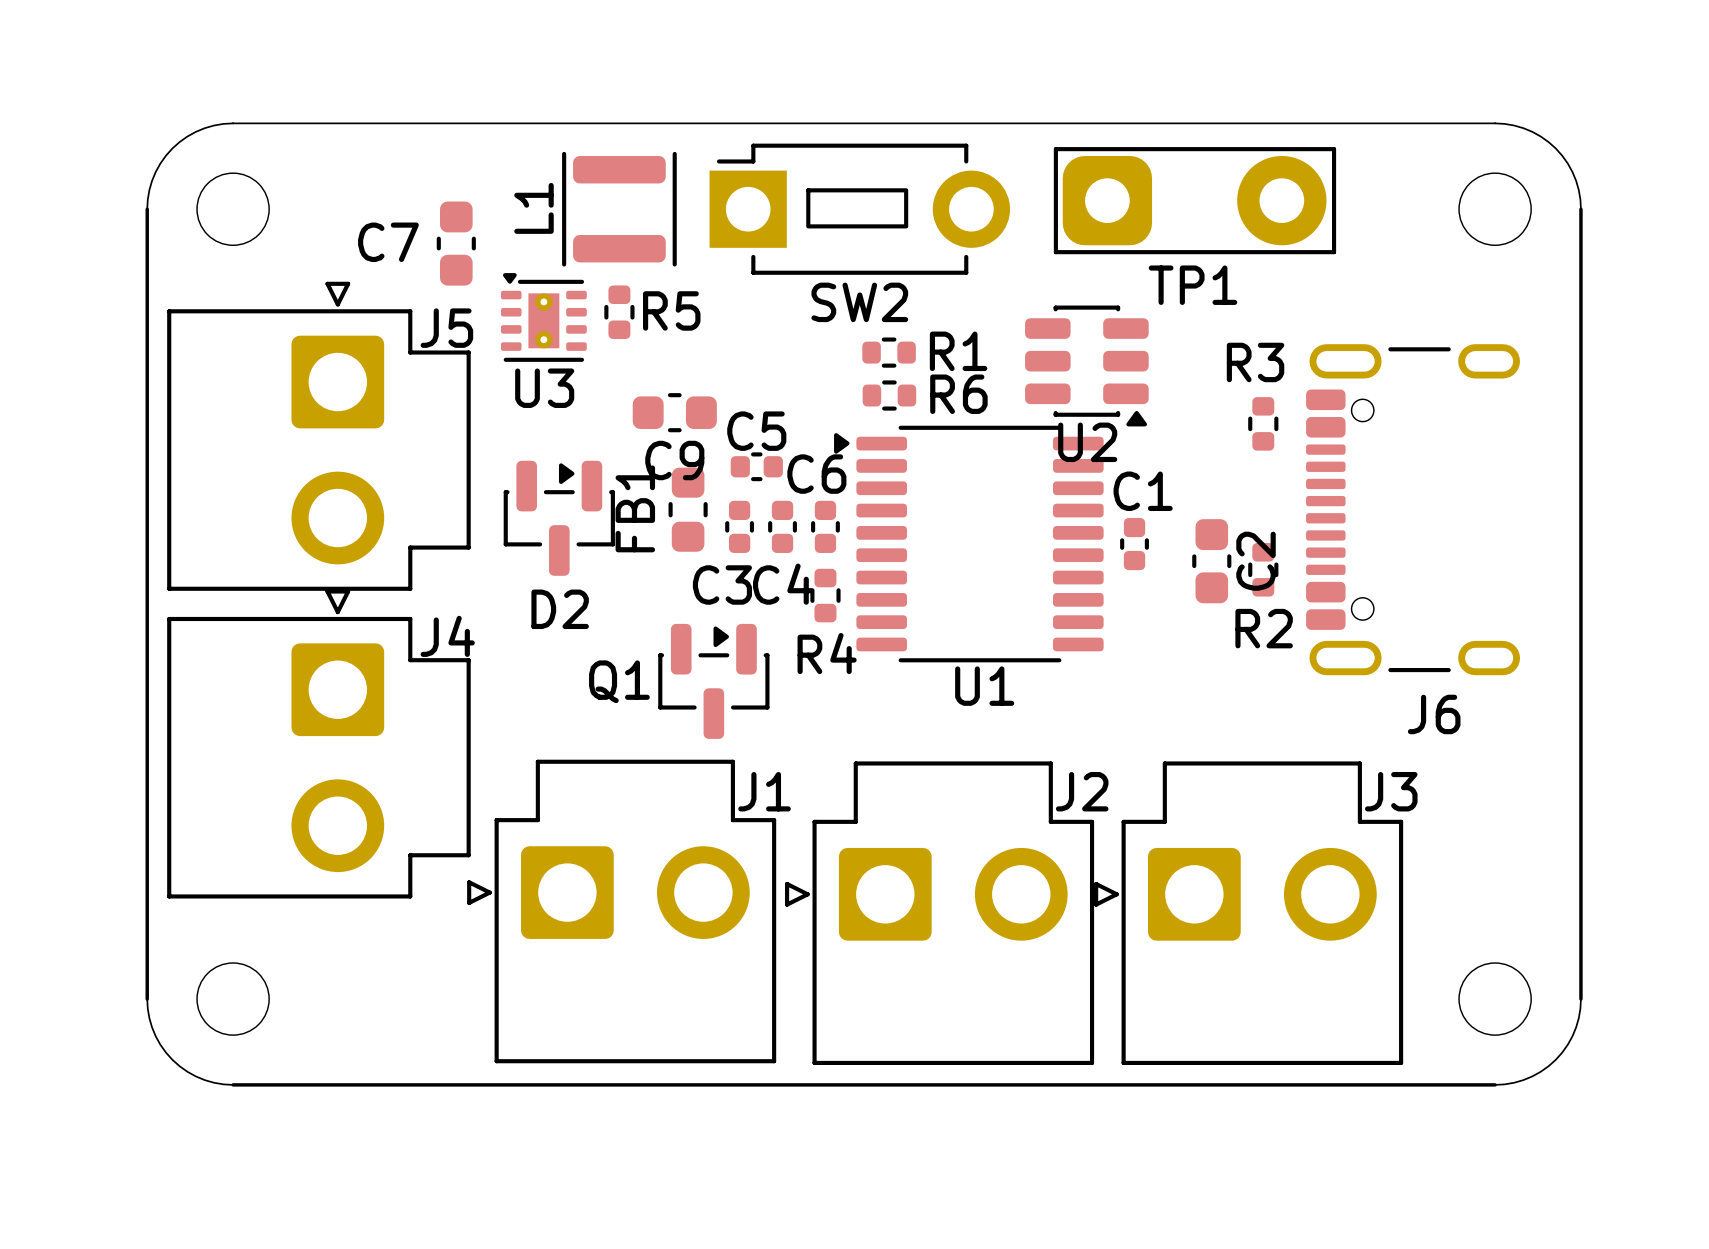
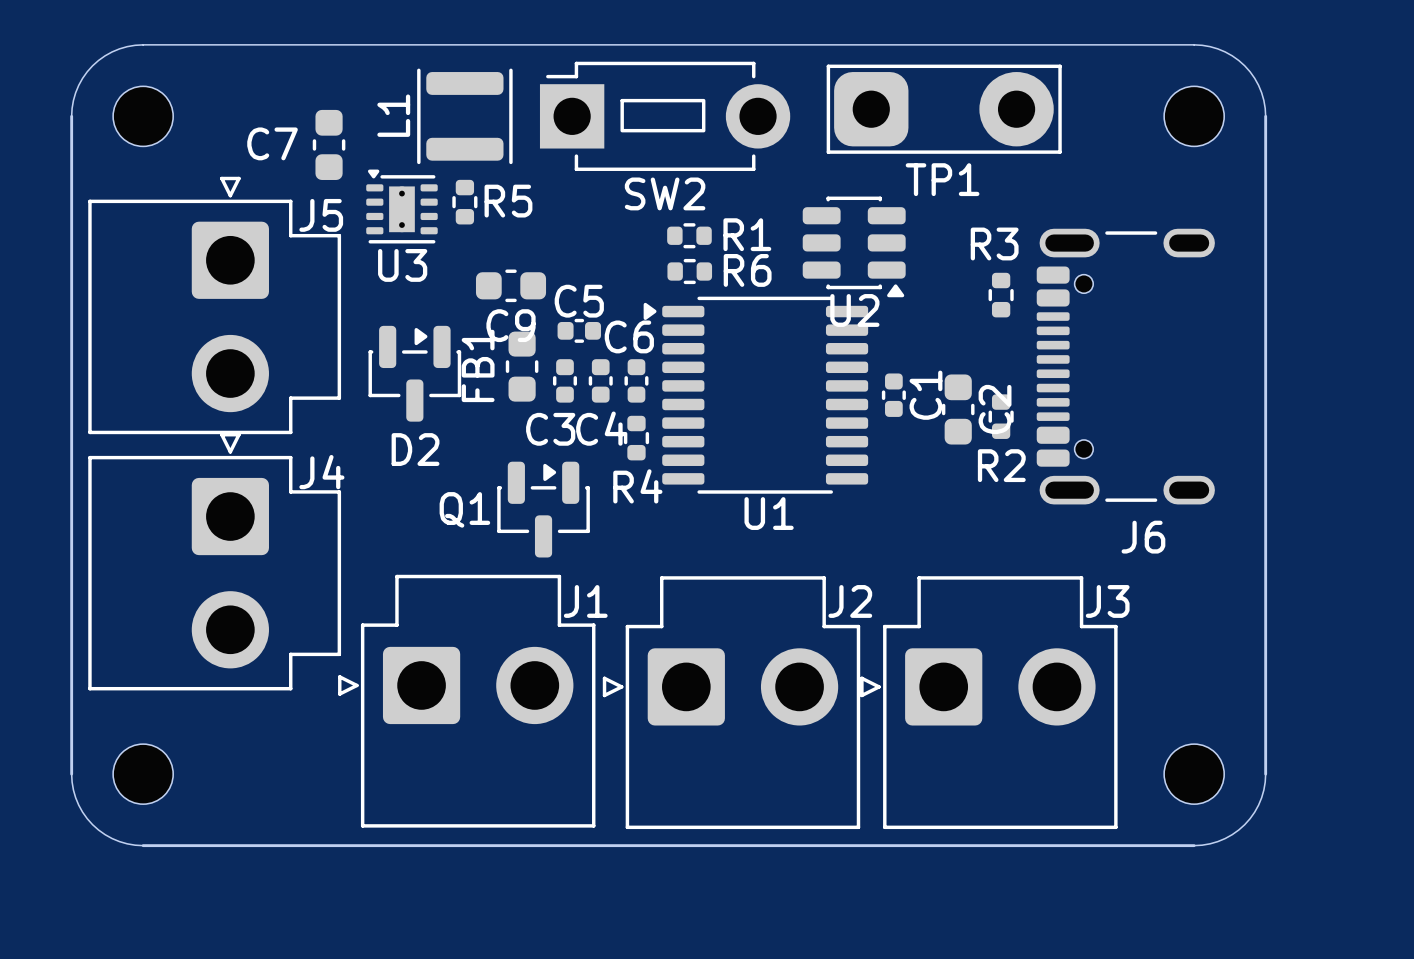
C1 name rotation: 0° (1143, 491) -> 90° counterclockwise (925, 395)

